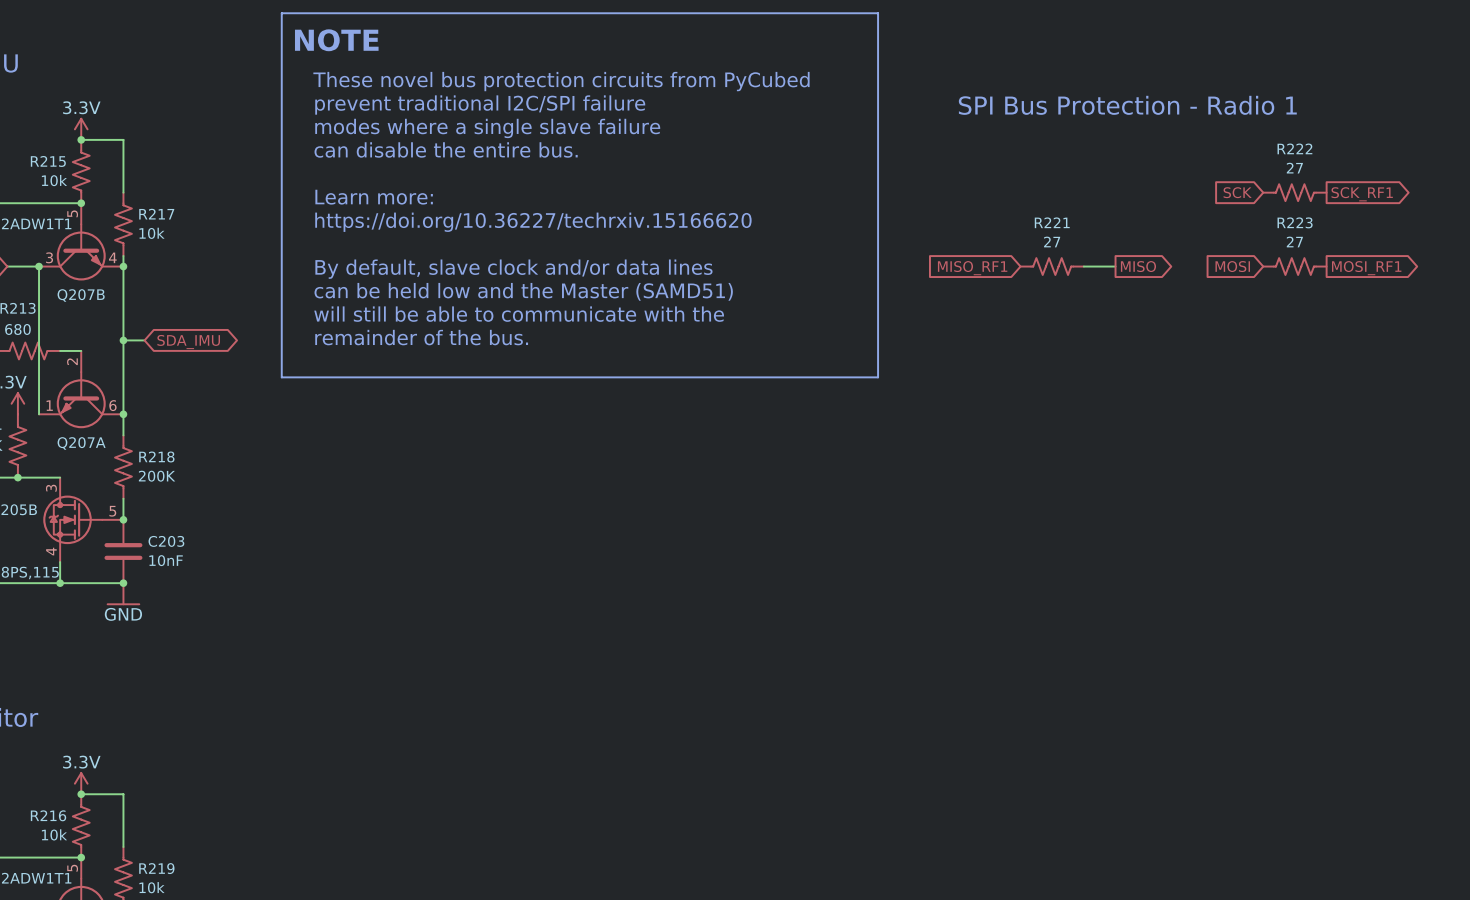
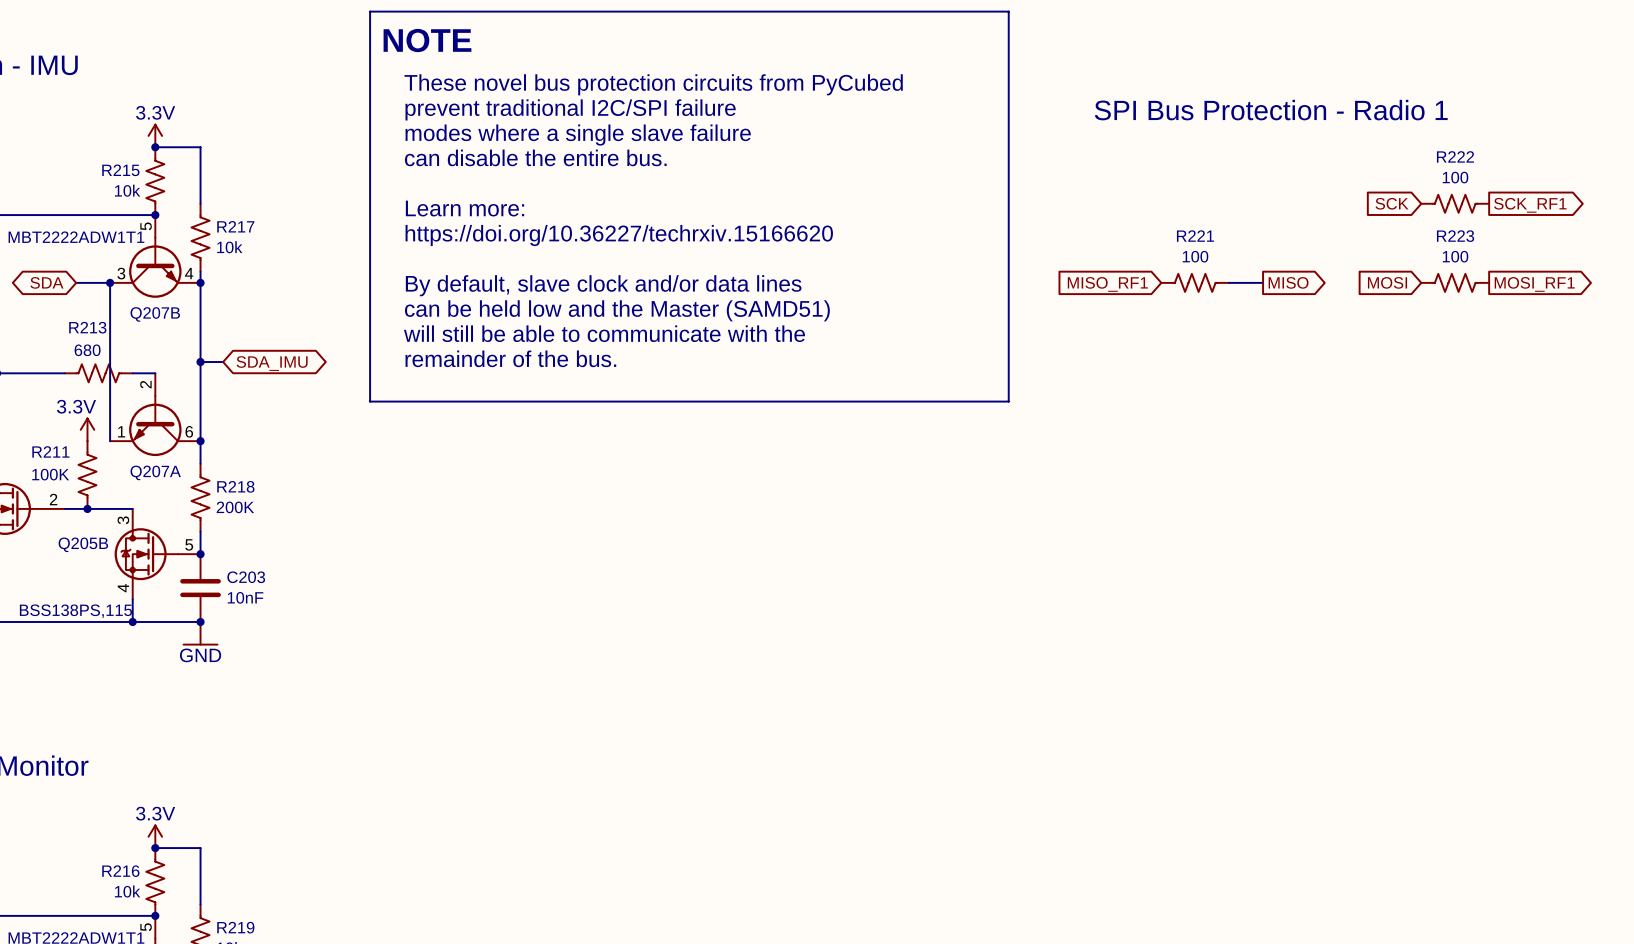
R222 value: 27 (1294, 168) -> 100 (1455, 177)
R221 value: 27 (1052, 241) -> 100 (1195, 256)
R223 value: 27 (1294, 241) -> 100 (1455, 256)

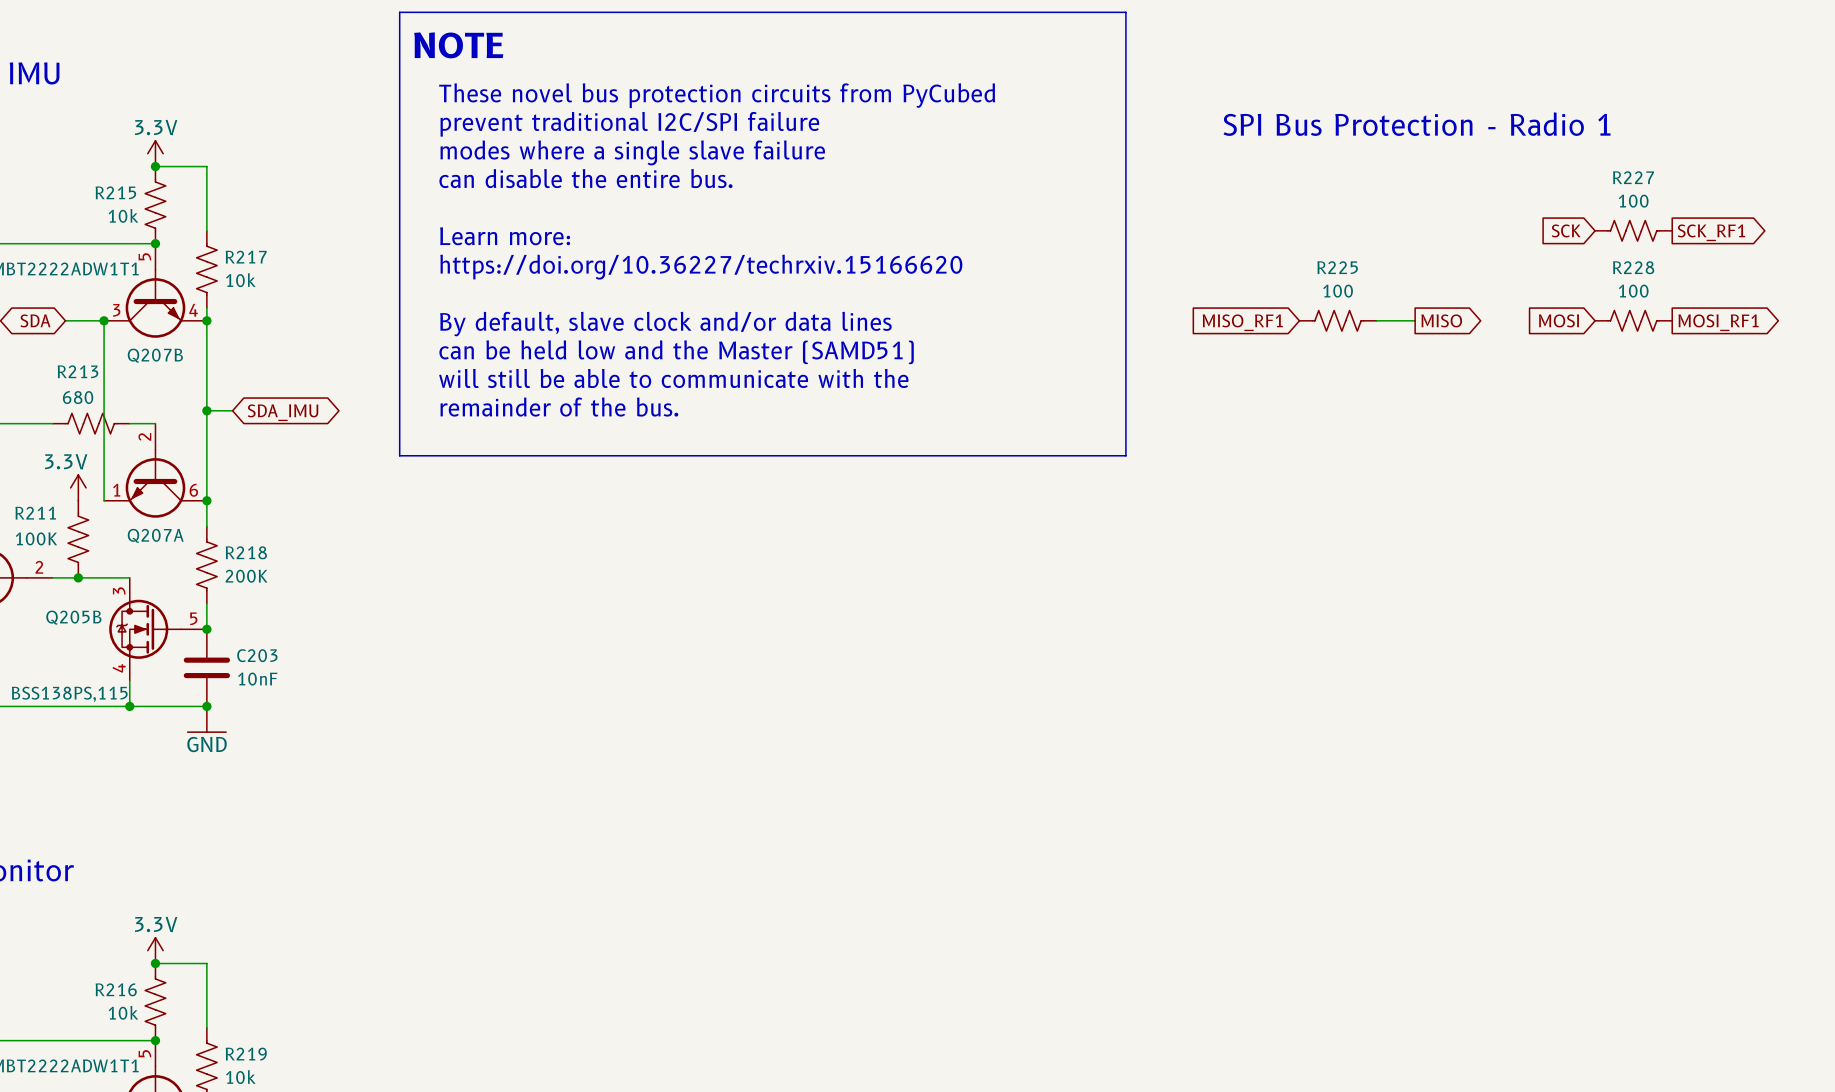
R222 name: R222 (1455, 156) -> R227 (1633, 177)
R221 name: R221 (1195, 236) -> R225 (1337, 267)
R223 name: R223 (1455, 236) -> R228 (1633, 267)

